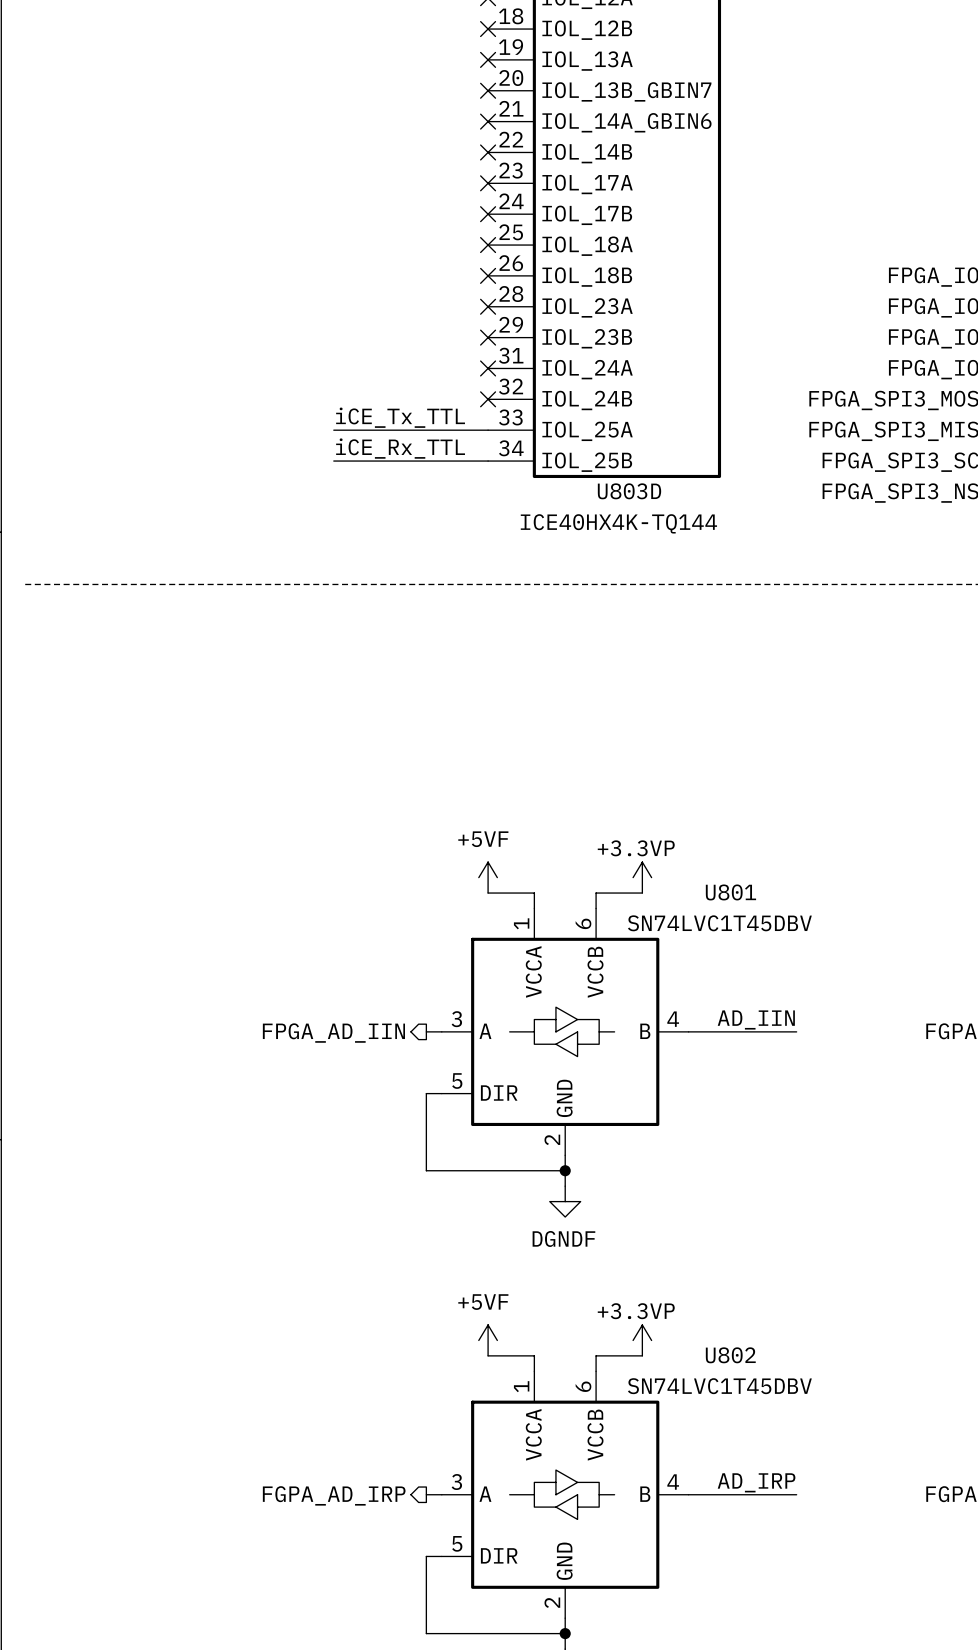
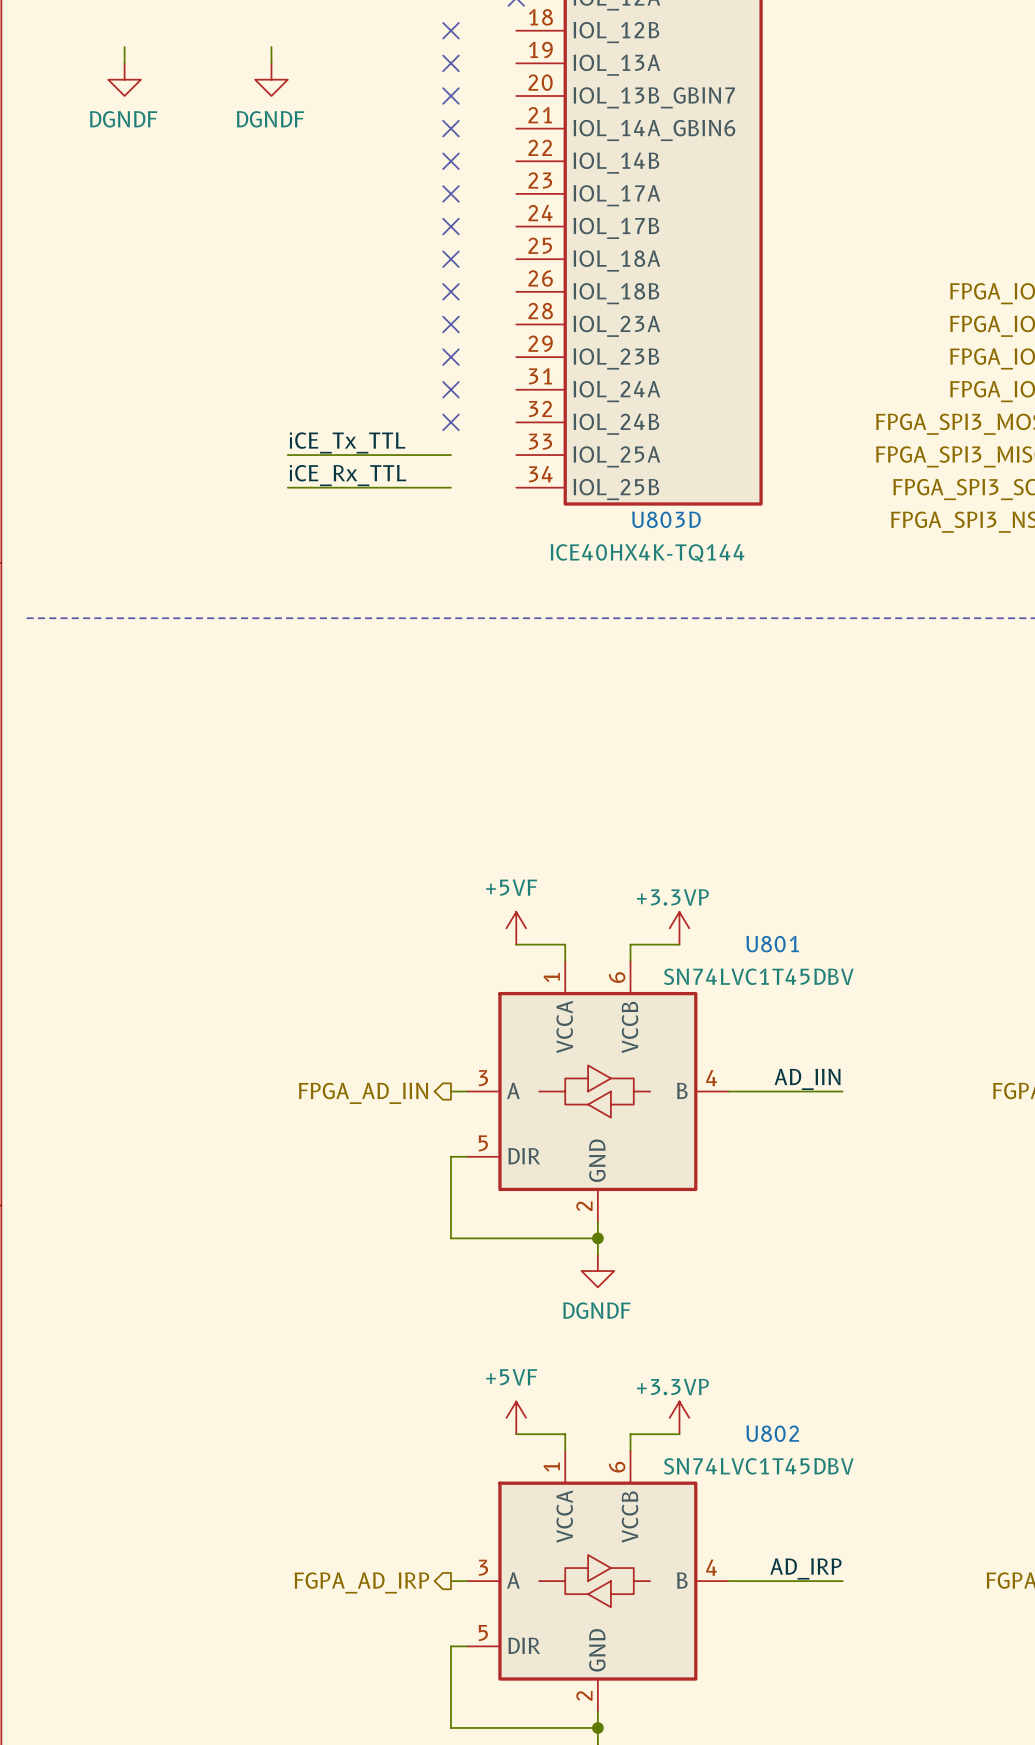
no-connect mark: none -> (450, 30)
no-connect mark: (488, 29) -> none
wire: none -> (124, 47) (124, 63)
wire: none -> (271, 47) (271, 63)
no-connect mark: none -> (450, 63)
no-connect mark: (488, 59) -> none
power symbol: none -> DGNDF (124, 79)
power symbol: none -> DGNDF (271, 79)
no-connect mark: none -> (450, 96)
no-connect mark: (488, 90) -> none
no-connect mark: none -> (450, 128)
no-connect mark: (488, 121) -> none
no-connect mark: none -> (450, 161)
no-connect mark: (488, 152) -> none
no-connect mark: none -> (450, 193)
no-connect mark: (488, 183) -> none
no-connect mark: none -> (450, 226)
no-connect mark: (488, 214) -> none
no-connect mark: none -> (450, 259)
no-connect mark: (488, 245) -> none
no-connect mark: none -> (450, 291)
no-connect mark: (488, 275) -> none
no-connect mark: none -> (450, 324)
no-connect mark: (488, 306) -> none
no-connect mark: none -> (450, 357)
no-connect mark: (488, 337) -> none
no-connect mark: none -> (450, 389)
no-connect mark: (488, 368) -> none
no-connect mark: none -> (450, 422)
no-connect mark: (488, 399) -> none
label position: iCE_Tx_TTL (400, 417) -> iCE_Tx_TTL (347, 442)
wire: (426, 430) (488, 430) -> (287, 455) (353, 455)
label position: iCE_Rx_TTL (400, 448) -> iCE_Rx_TTL (348, 475)
wire: (426, 461) (488, 461) -> (287, 487) (353, 487)

